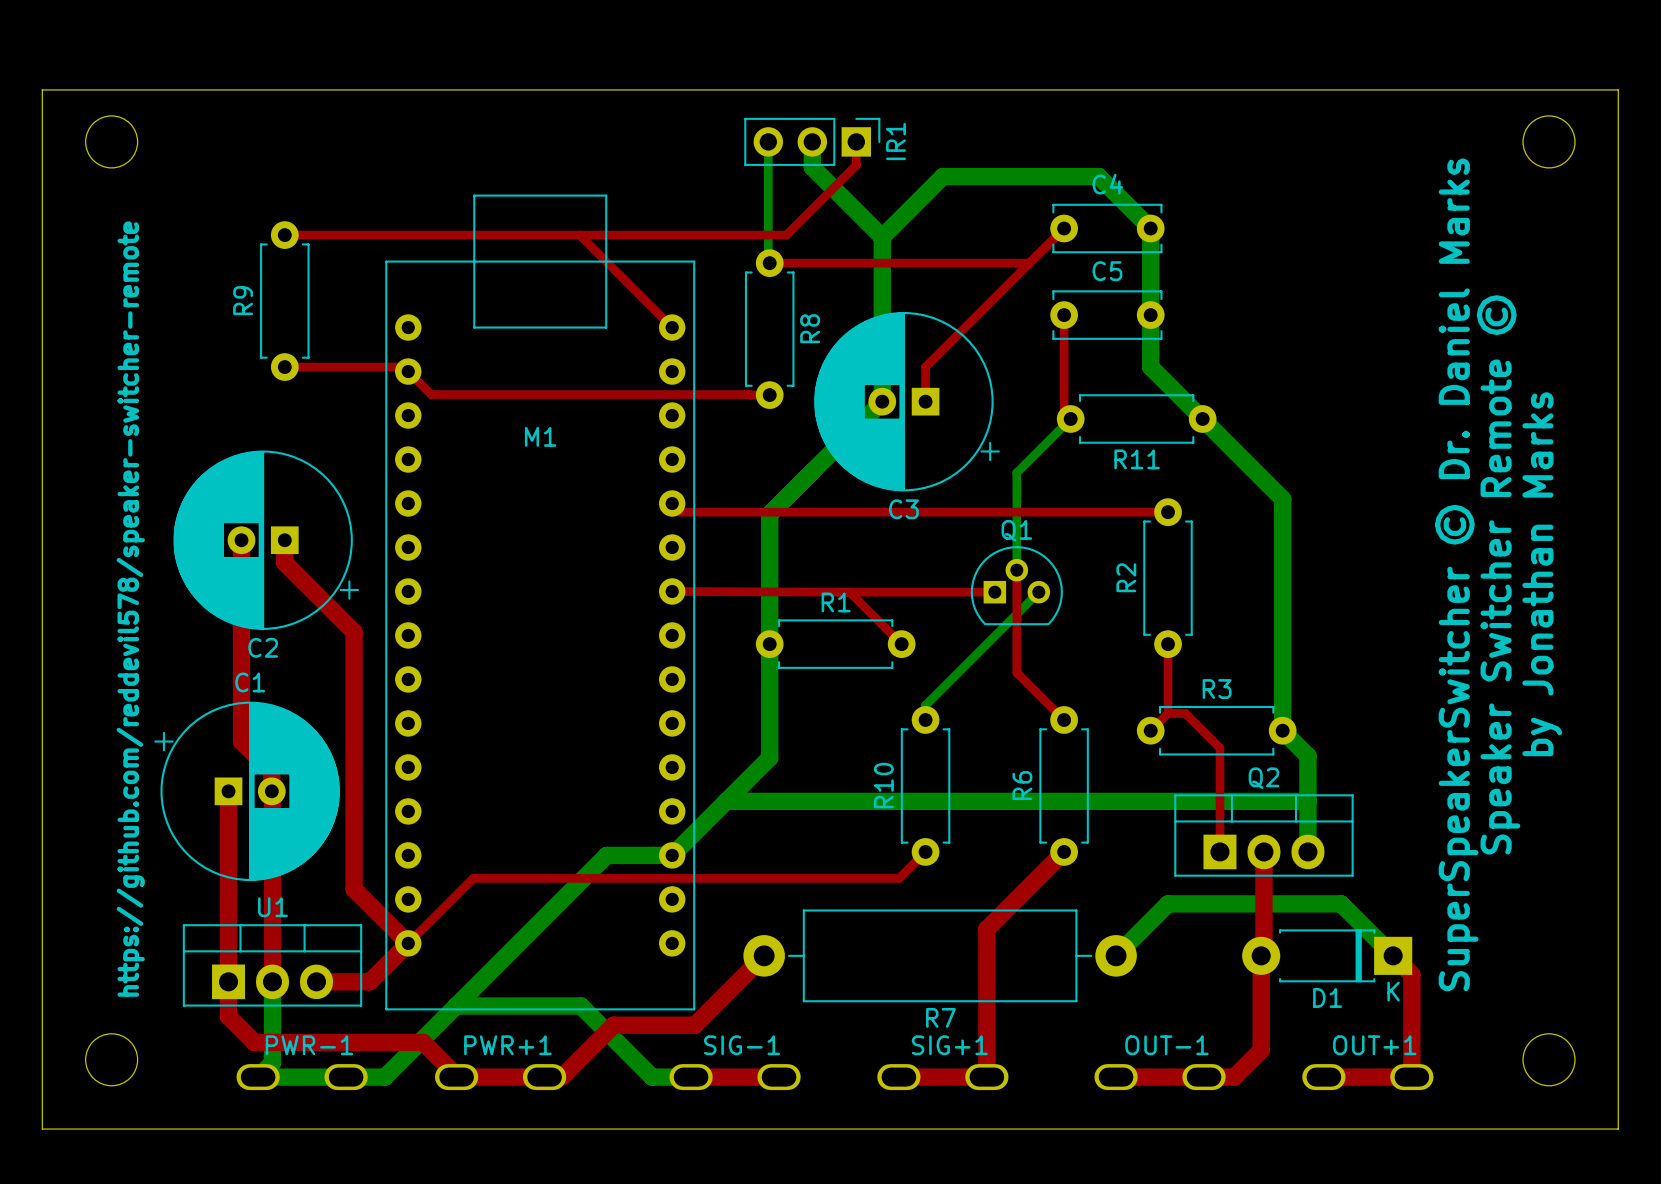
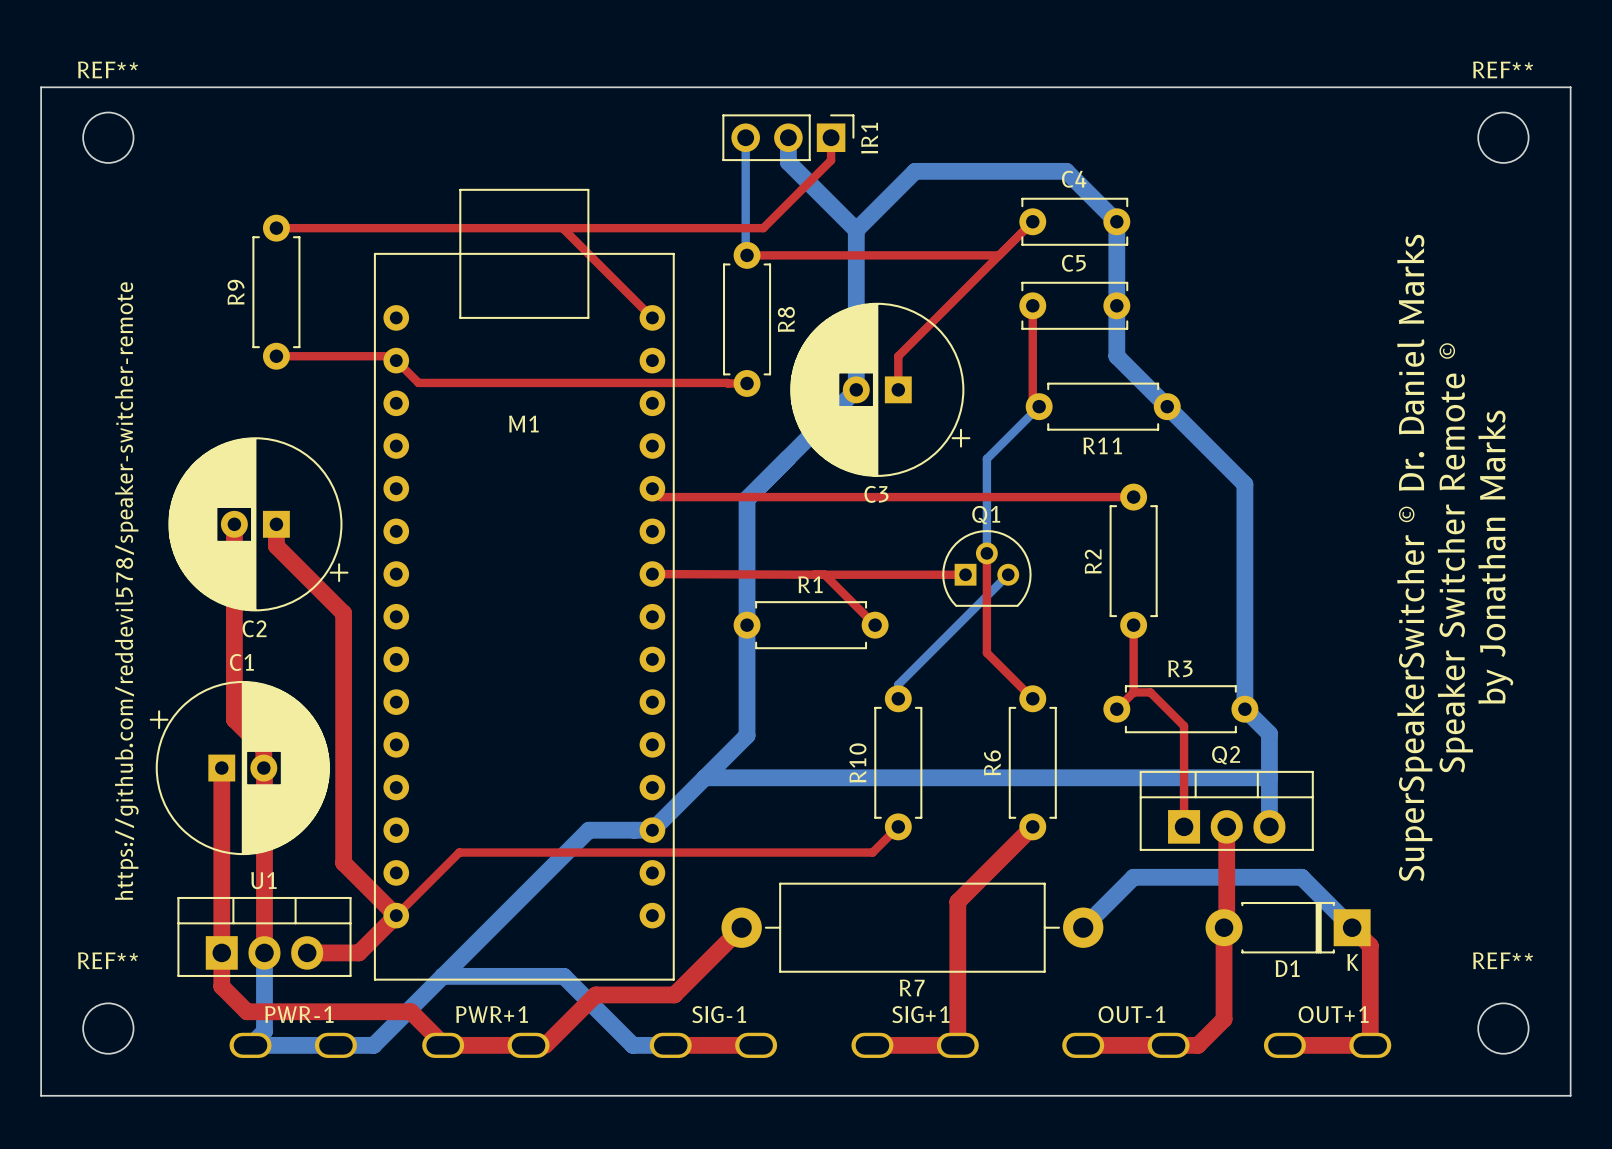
REF** name: none -> REF** (108, 69)
REF** name: none -> REF** (1503, 69)
REF** name: none -> REF** (108, 960)
REF** name: none -> REF** (1503, 960)

